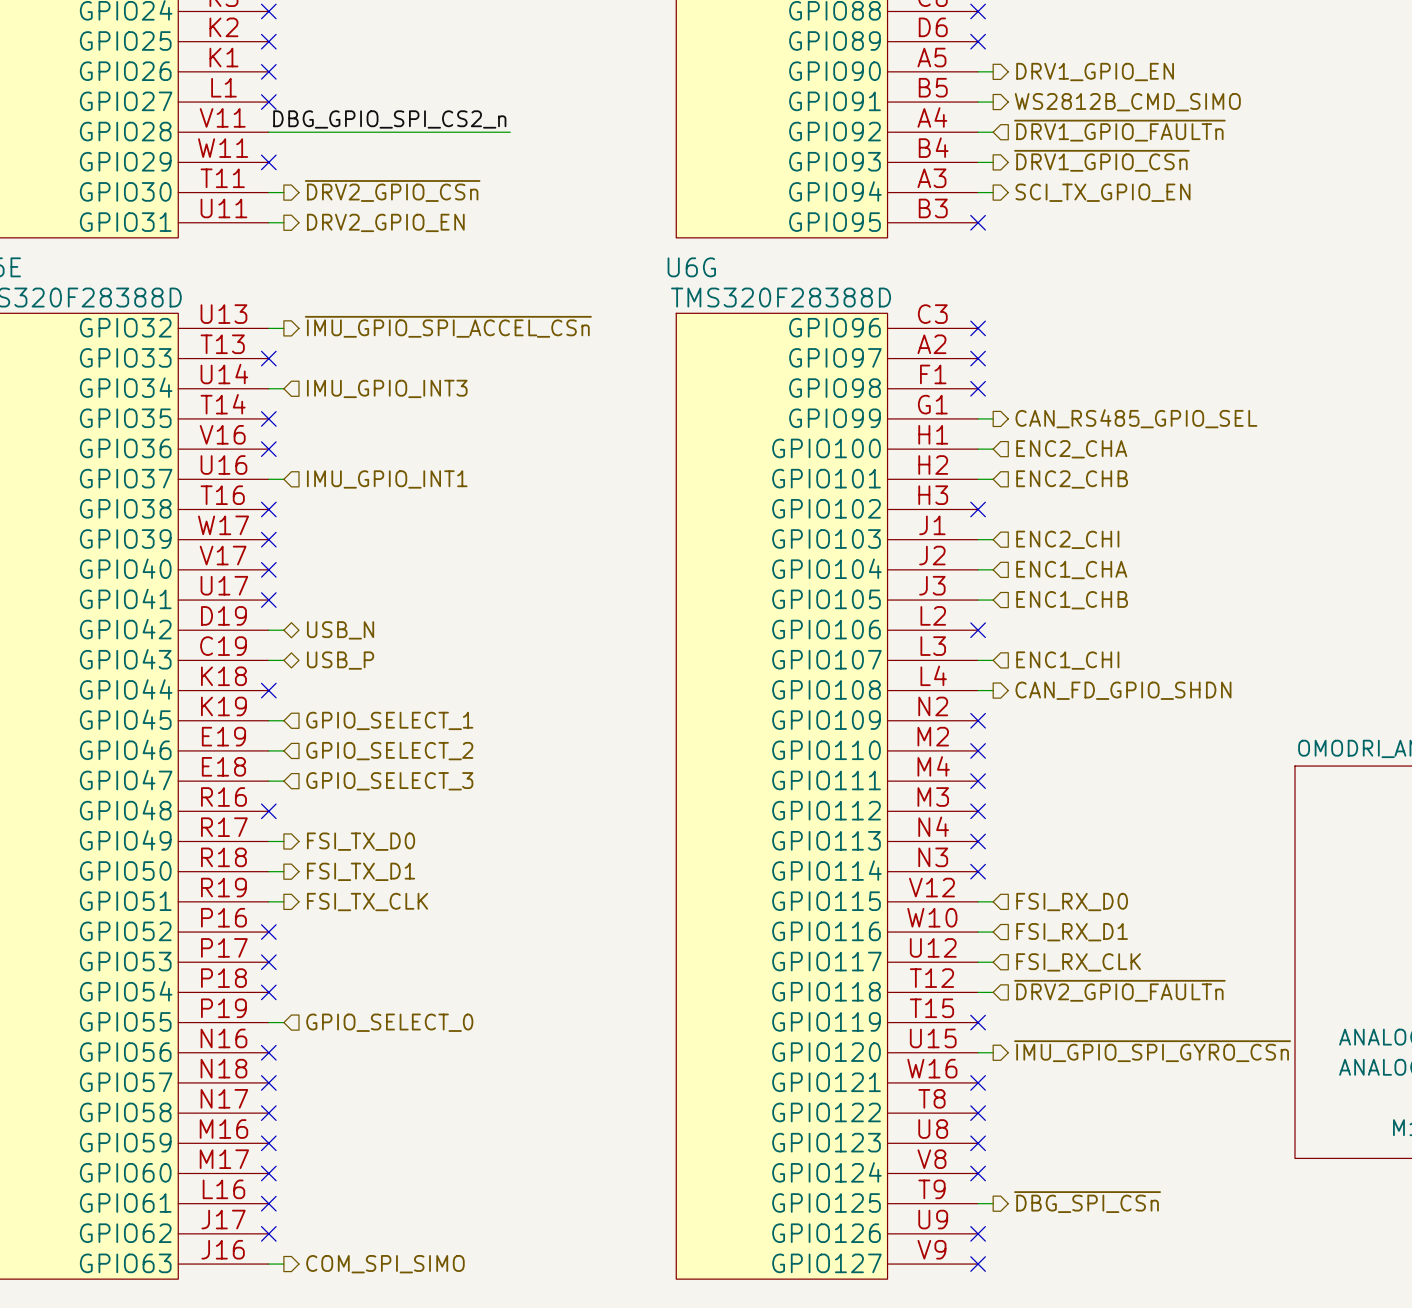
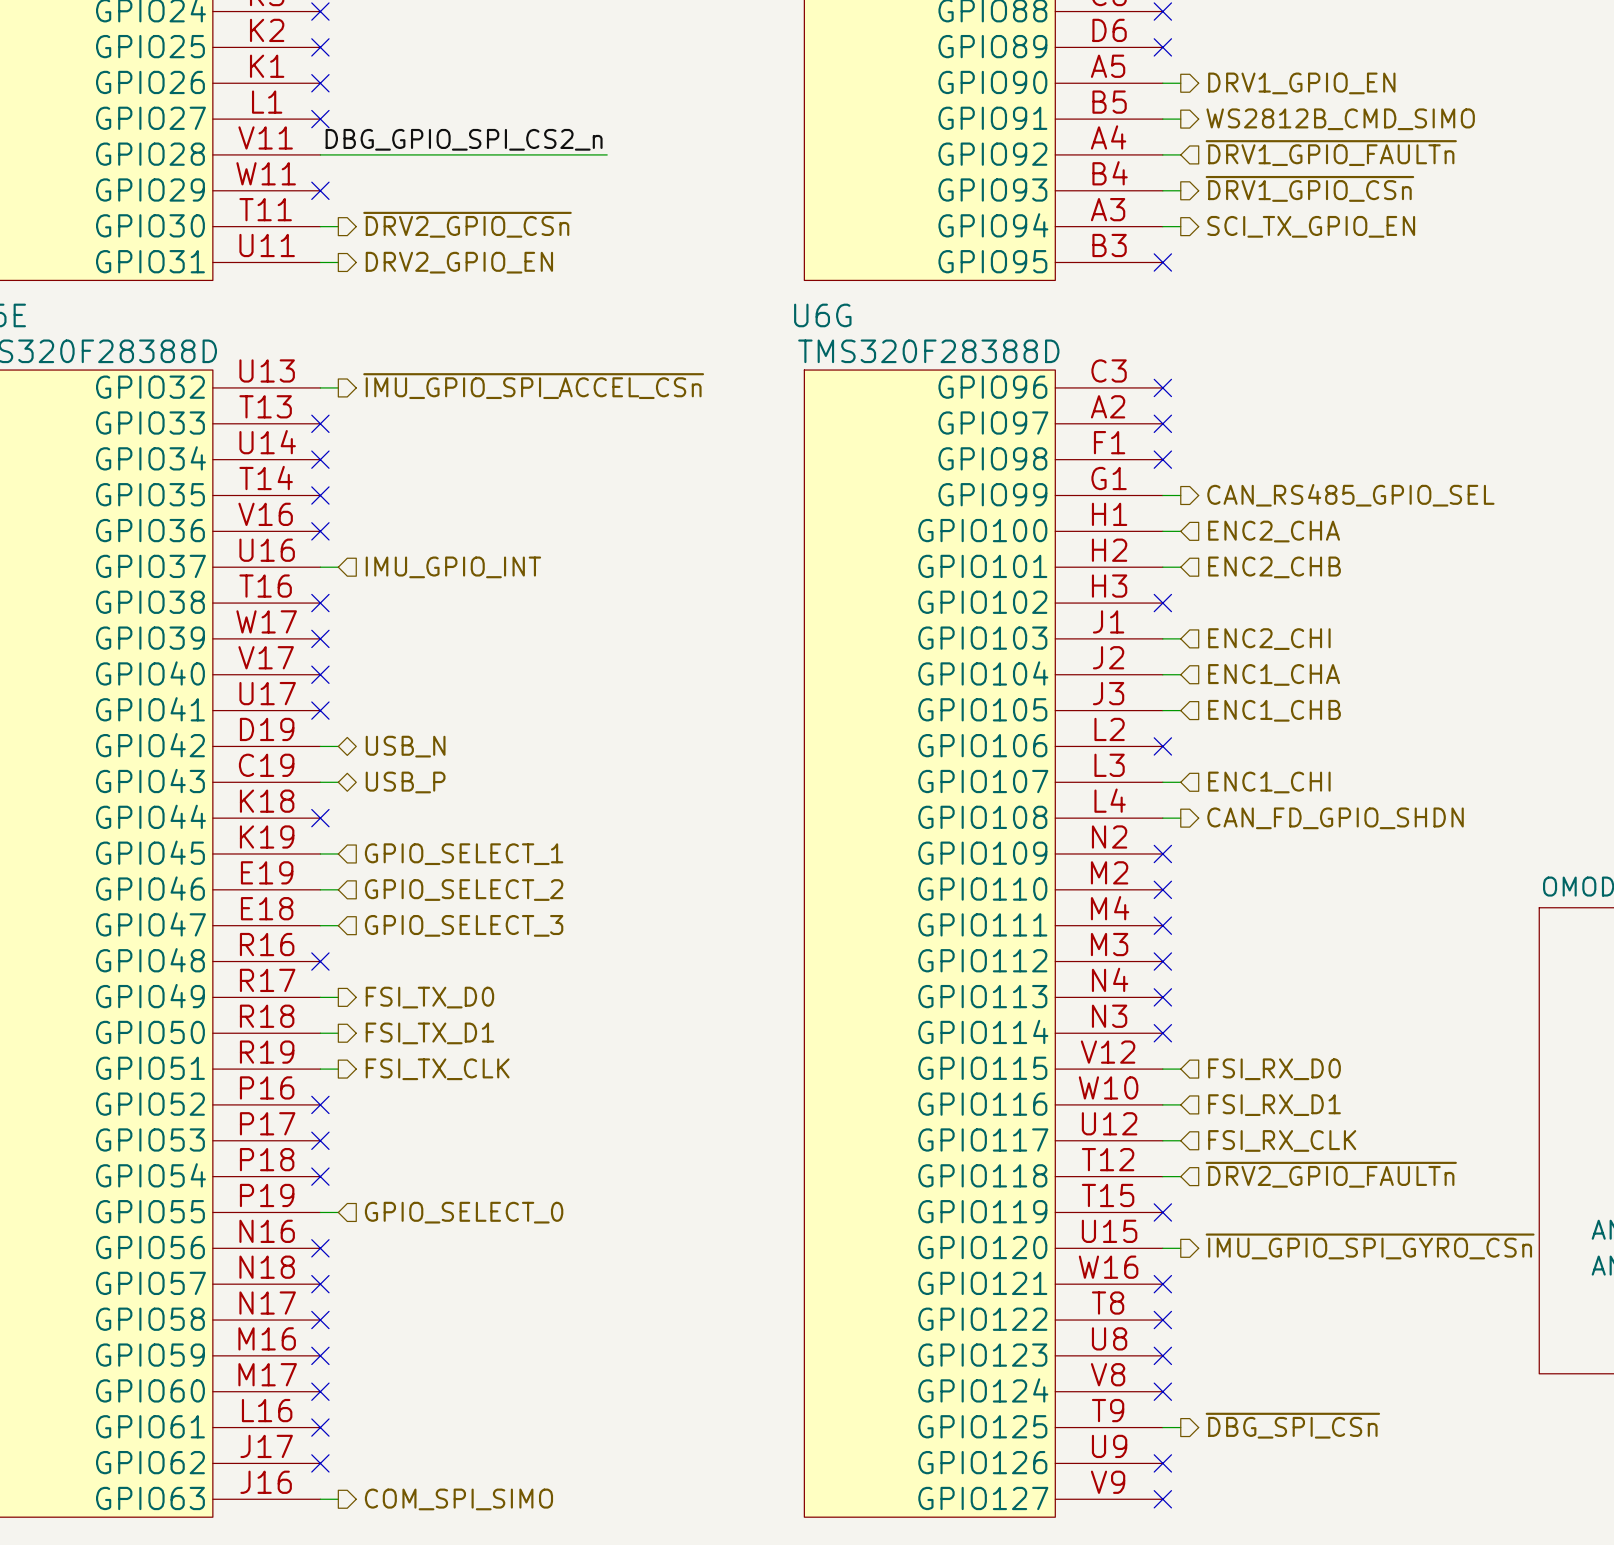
wire: (268, 388) (283, 388) -> none
no-connect mark: none -> (320, 459)
hierarchical label: IMU_GPIO_INT3 (387, 388) -> none
hierarchical label: IMU_GPIO_INT1 (387, 479) -> IMU_GPIO_INT (453, 567)

